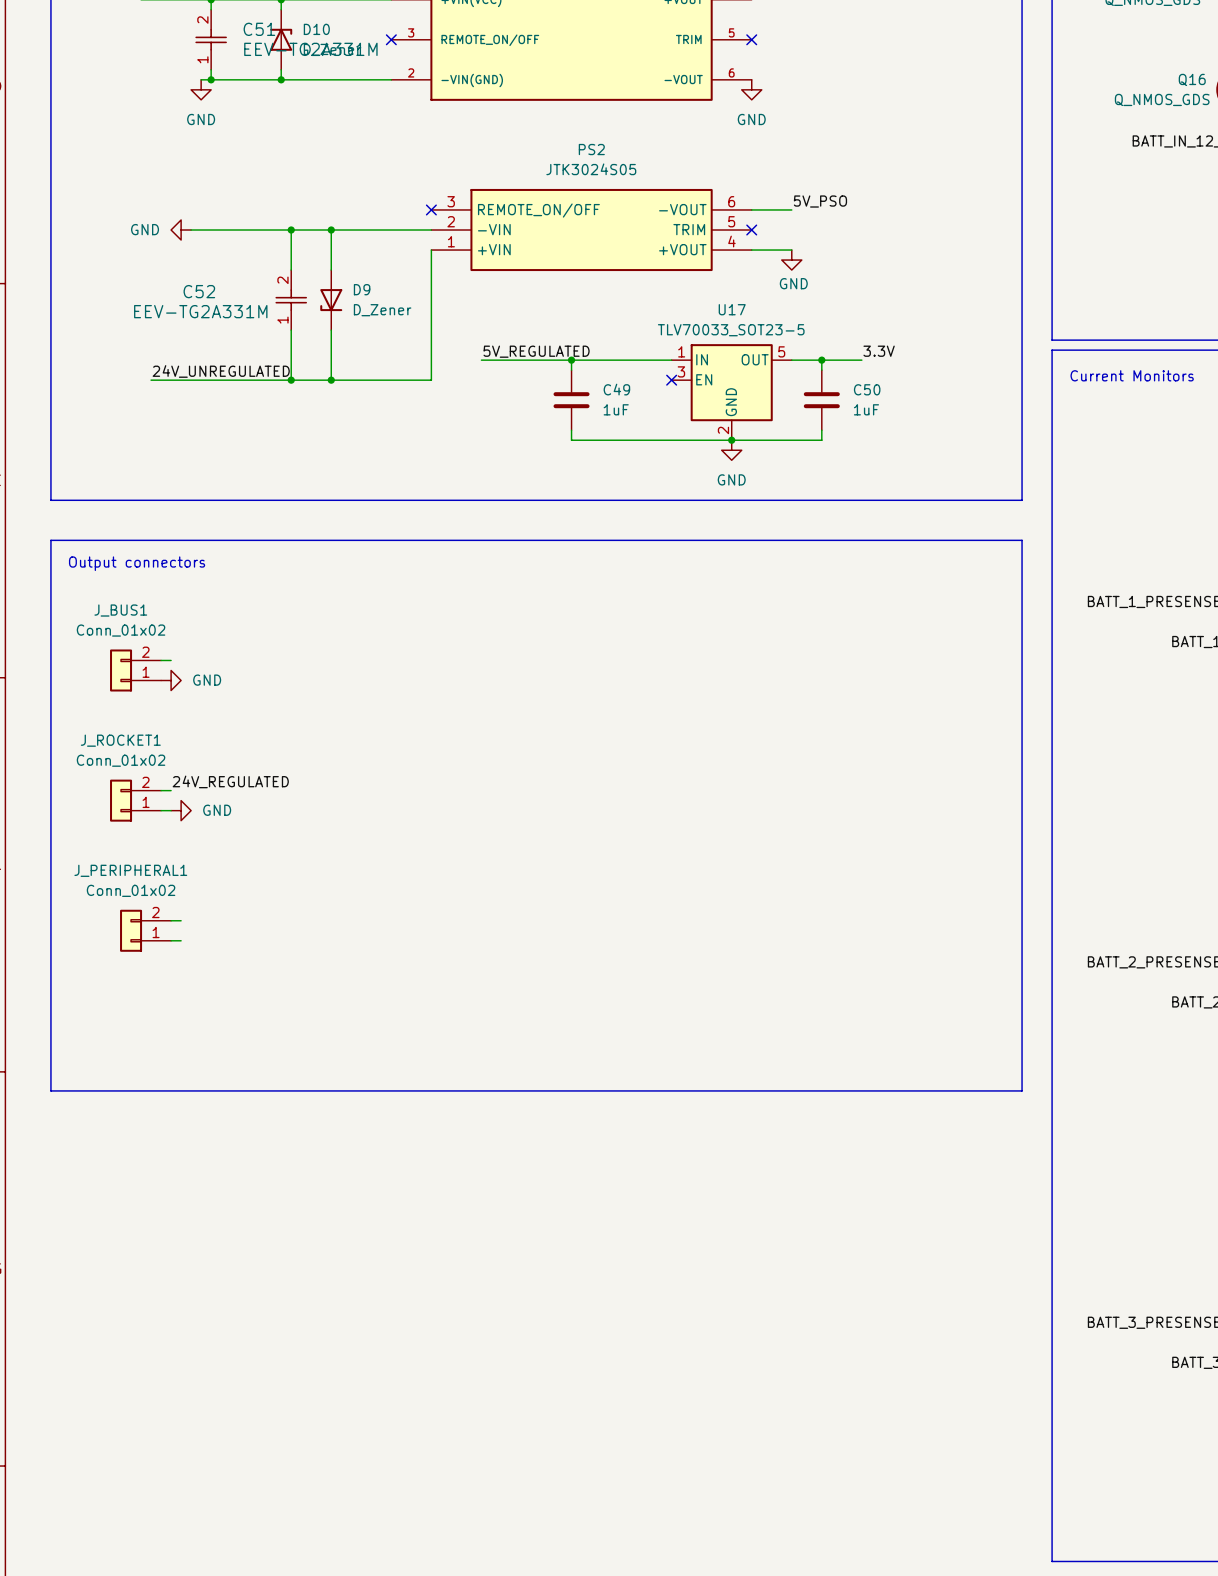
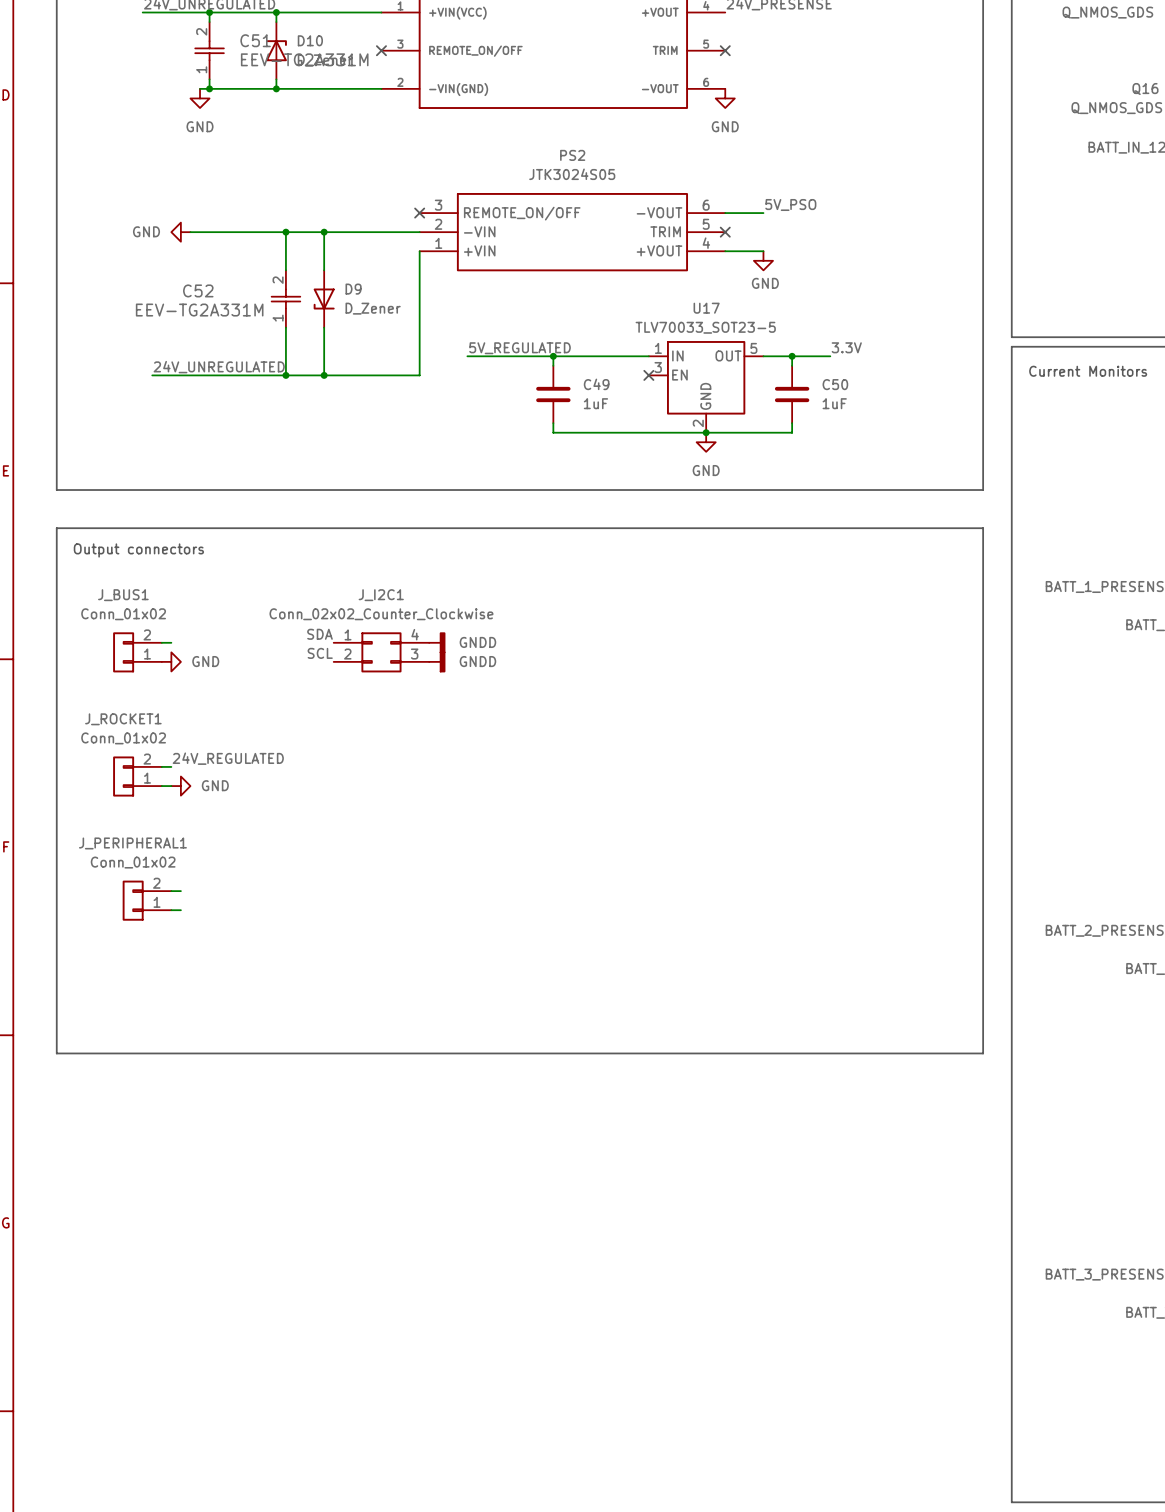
label: none -> SDA (319, 634)
power symbol: none -> GNDD (437, 642)
J_I2C1: none -> Conn_02x02_Counter_Clockwise (381, 652)
label: none -> SCL (320, 653)
power symbol: none -> GNDD (437, 661)

